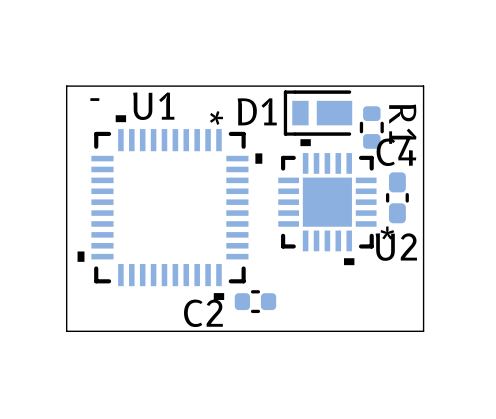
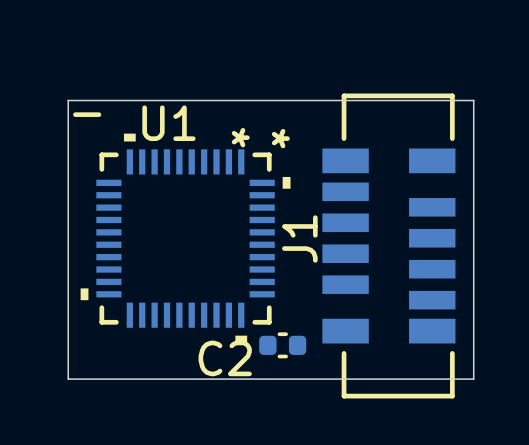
D1: (318, 113) -> none
R1: (371, 127) -> none
C4: (397, 197) -> none
U2: (327, 202) -> none
J1: none -> (388, 245)

